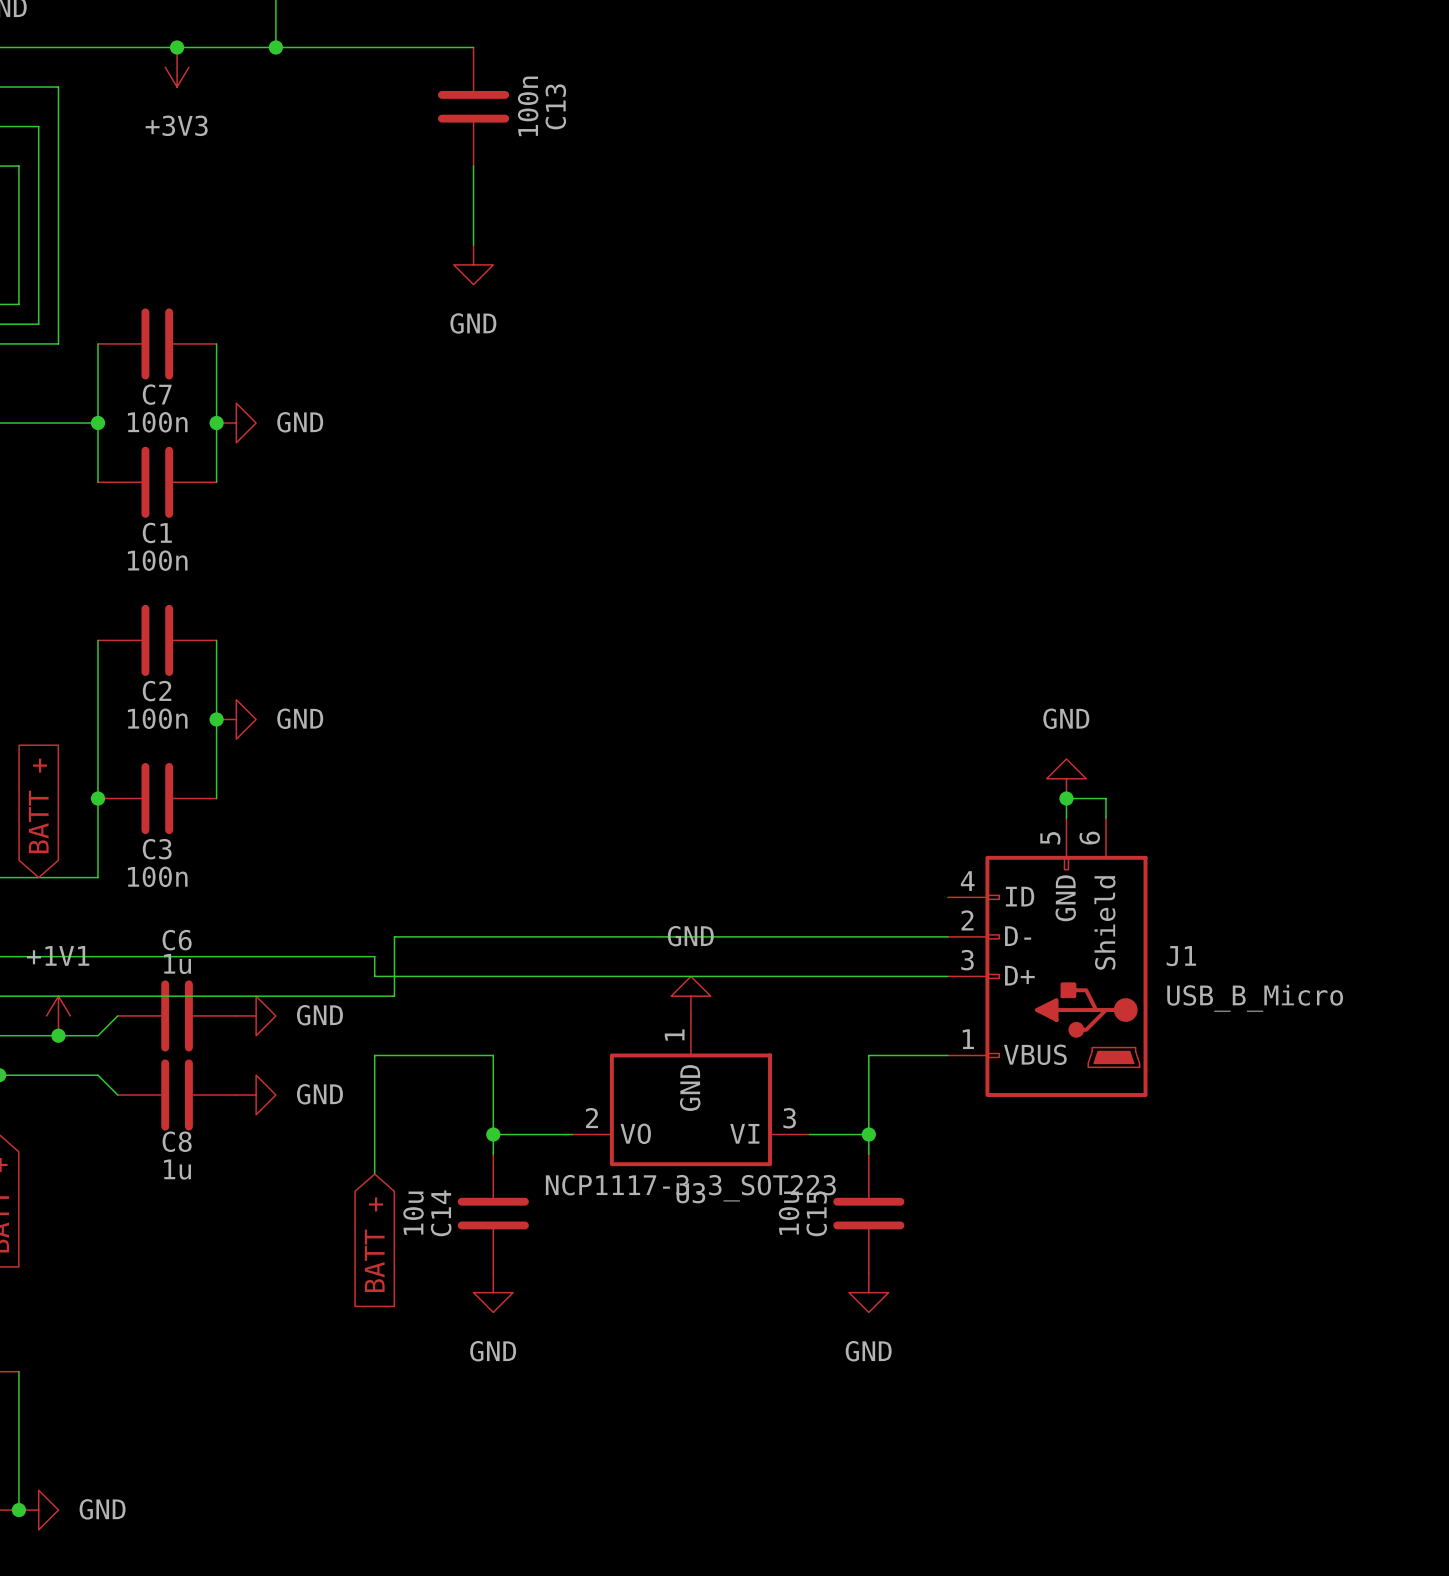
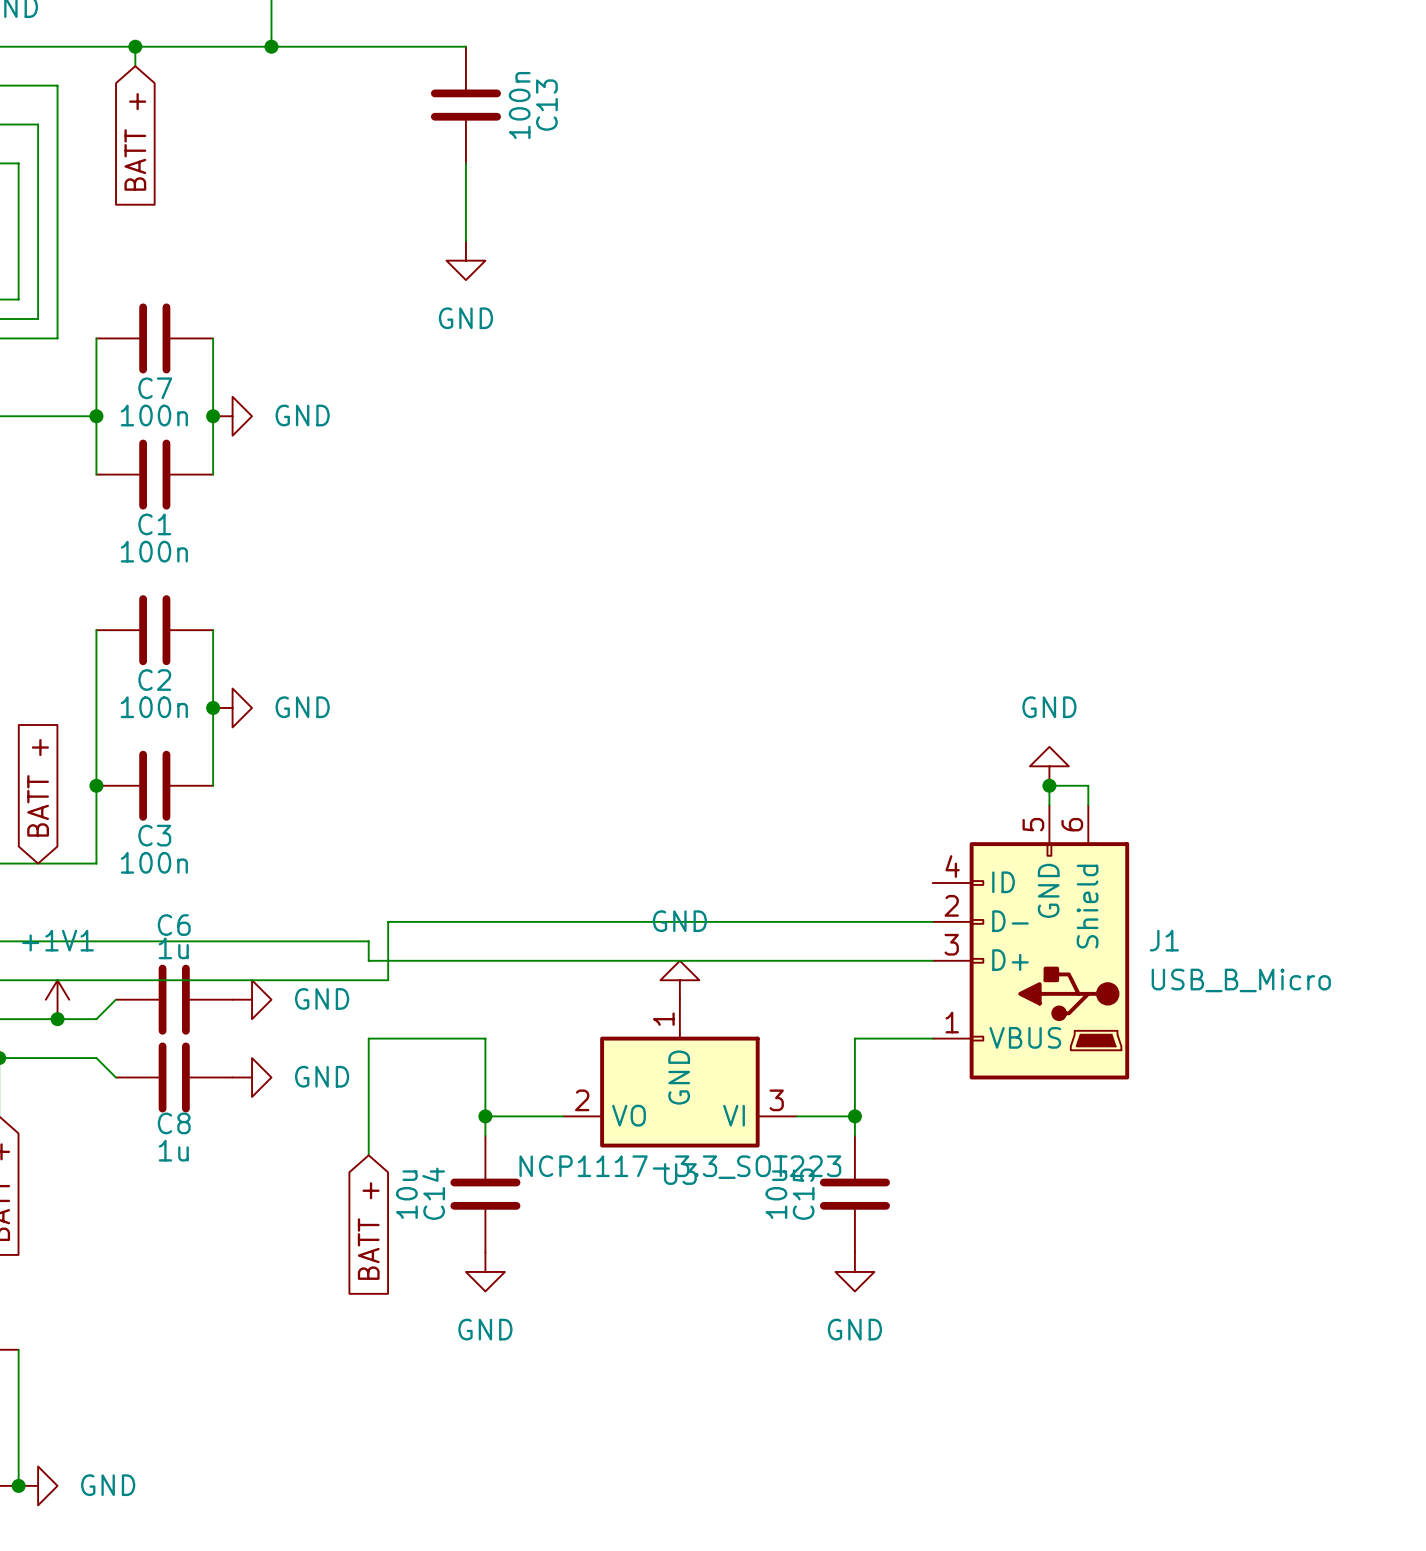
wire: none -> (135, 46) (135, 66)
junction position: (177, 47) -> (135, 46)
power symbol: +3V3 (177, 67) -> none
global label: none -> BATT + (135, 141)

